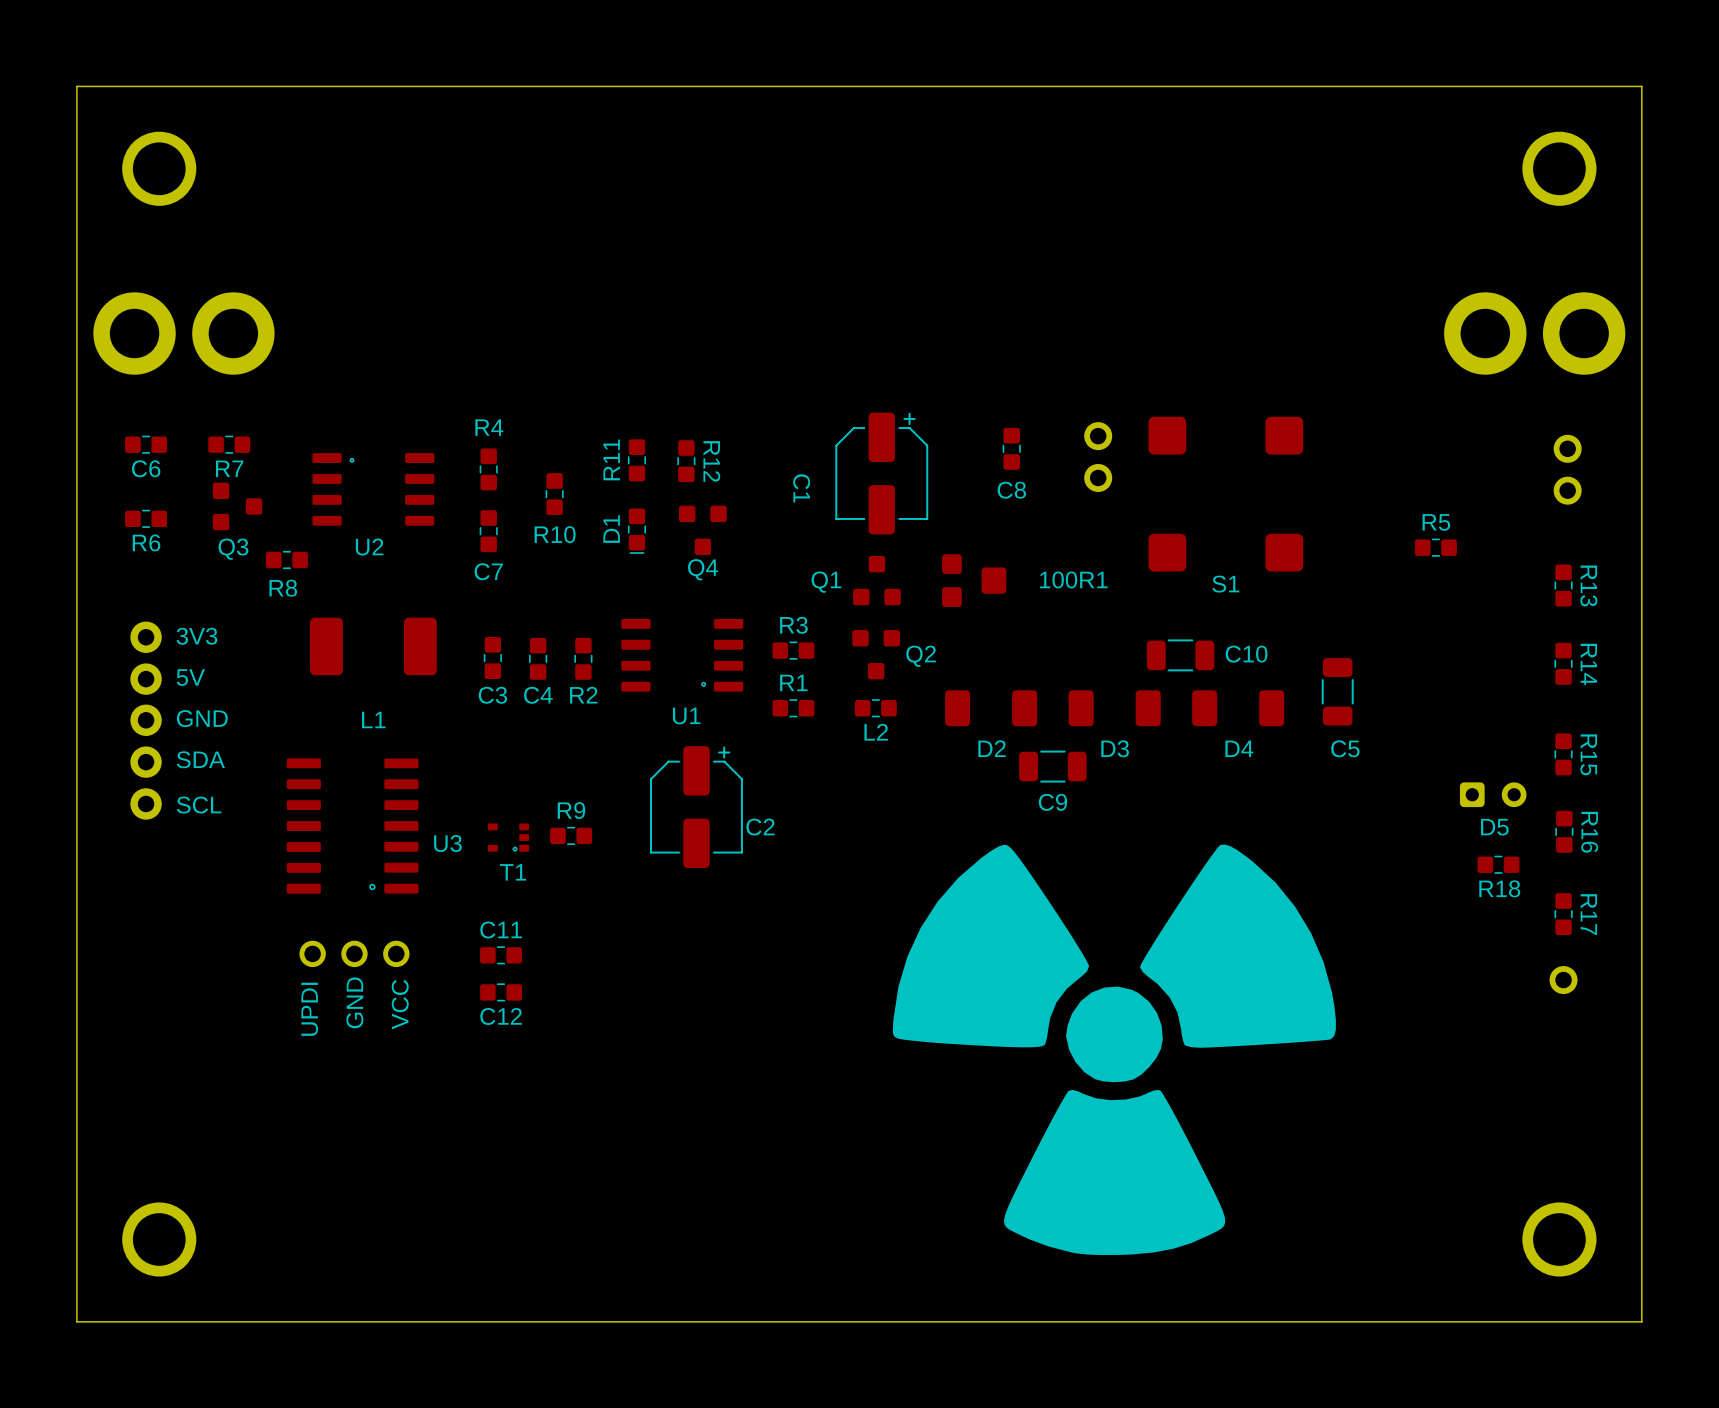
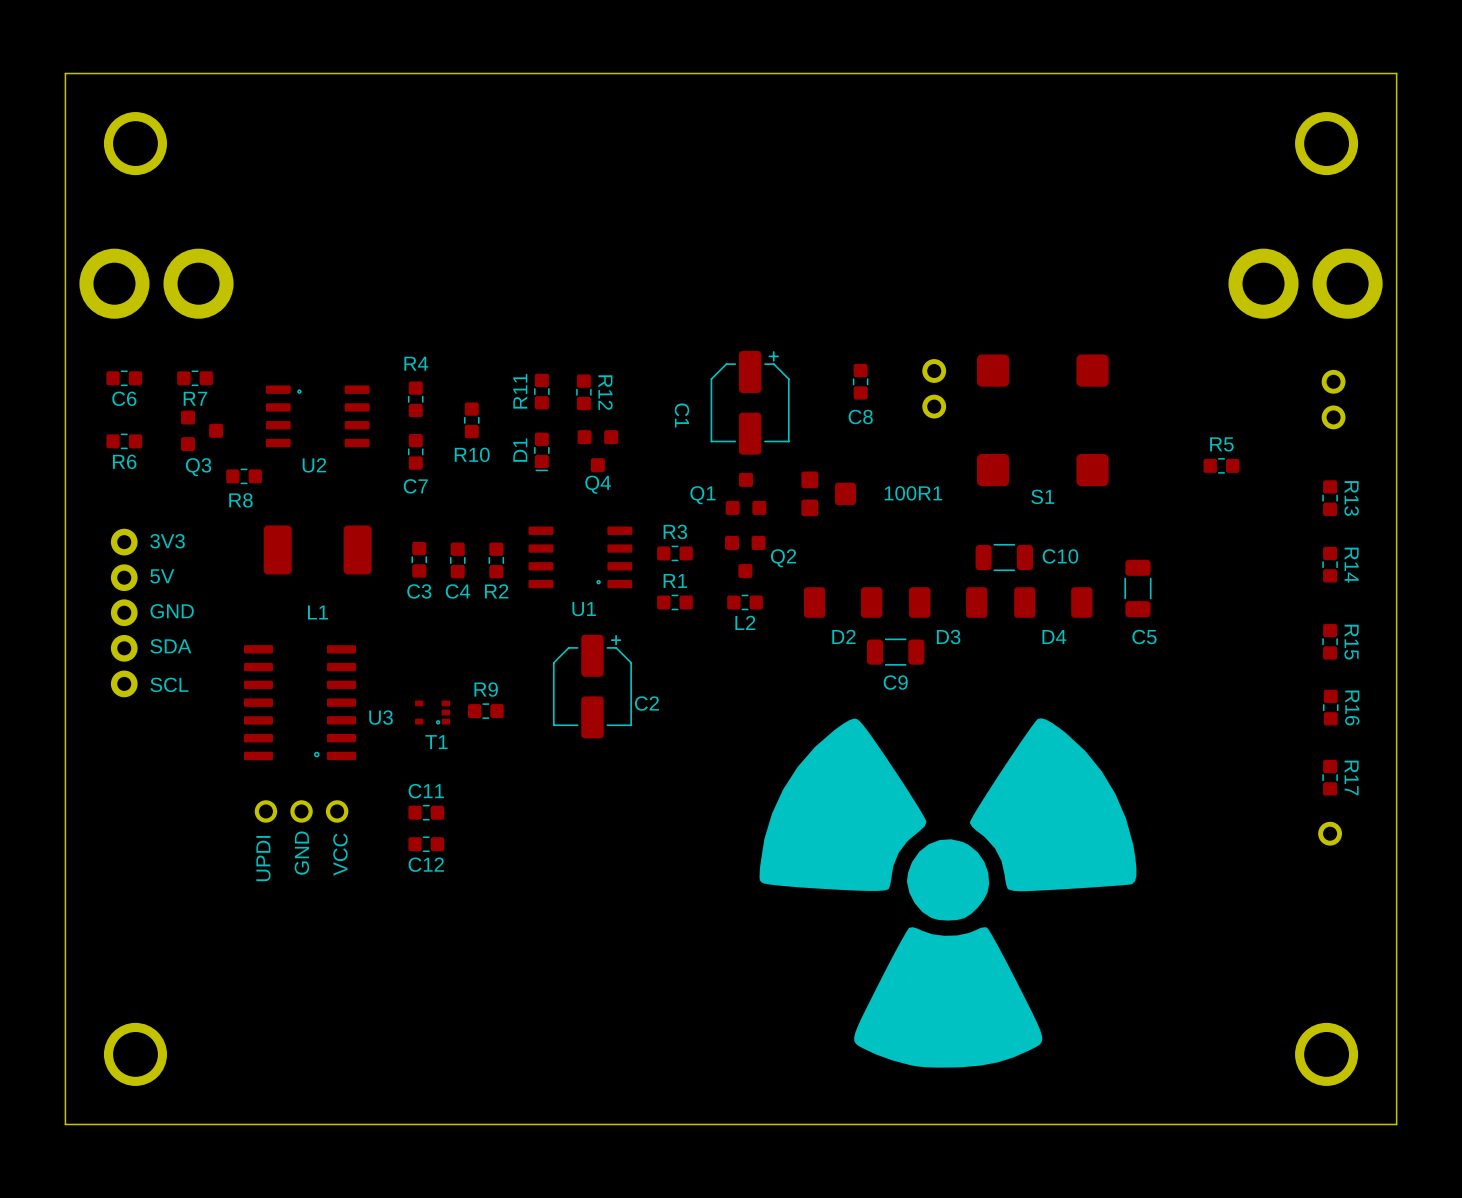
D5: (1493, 794) -> none
R18: (1498, 864) -> none

